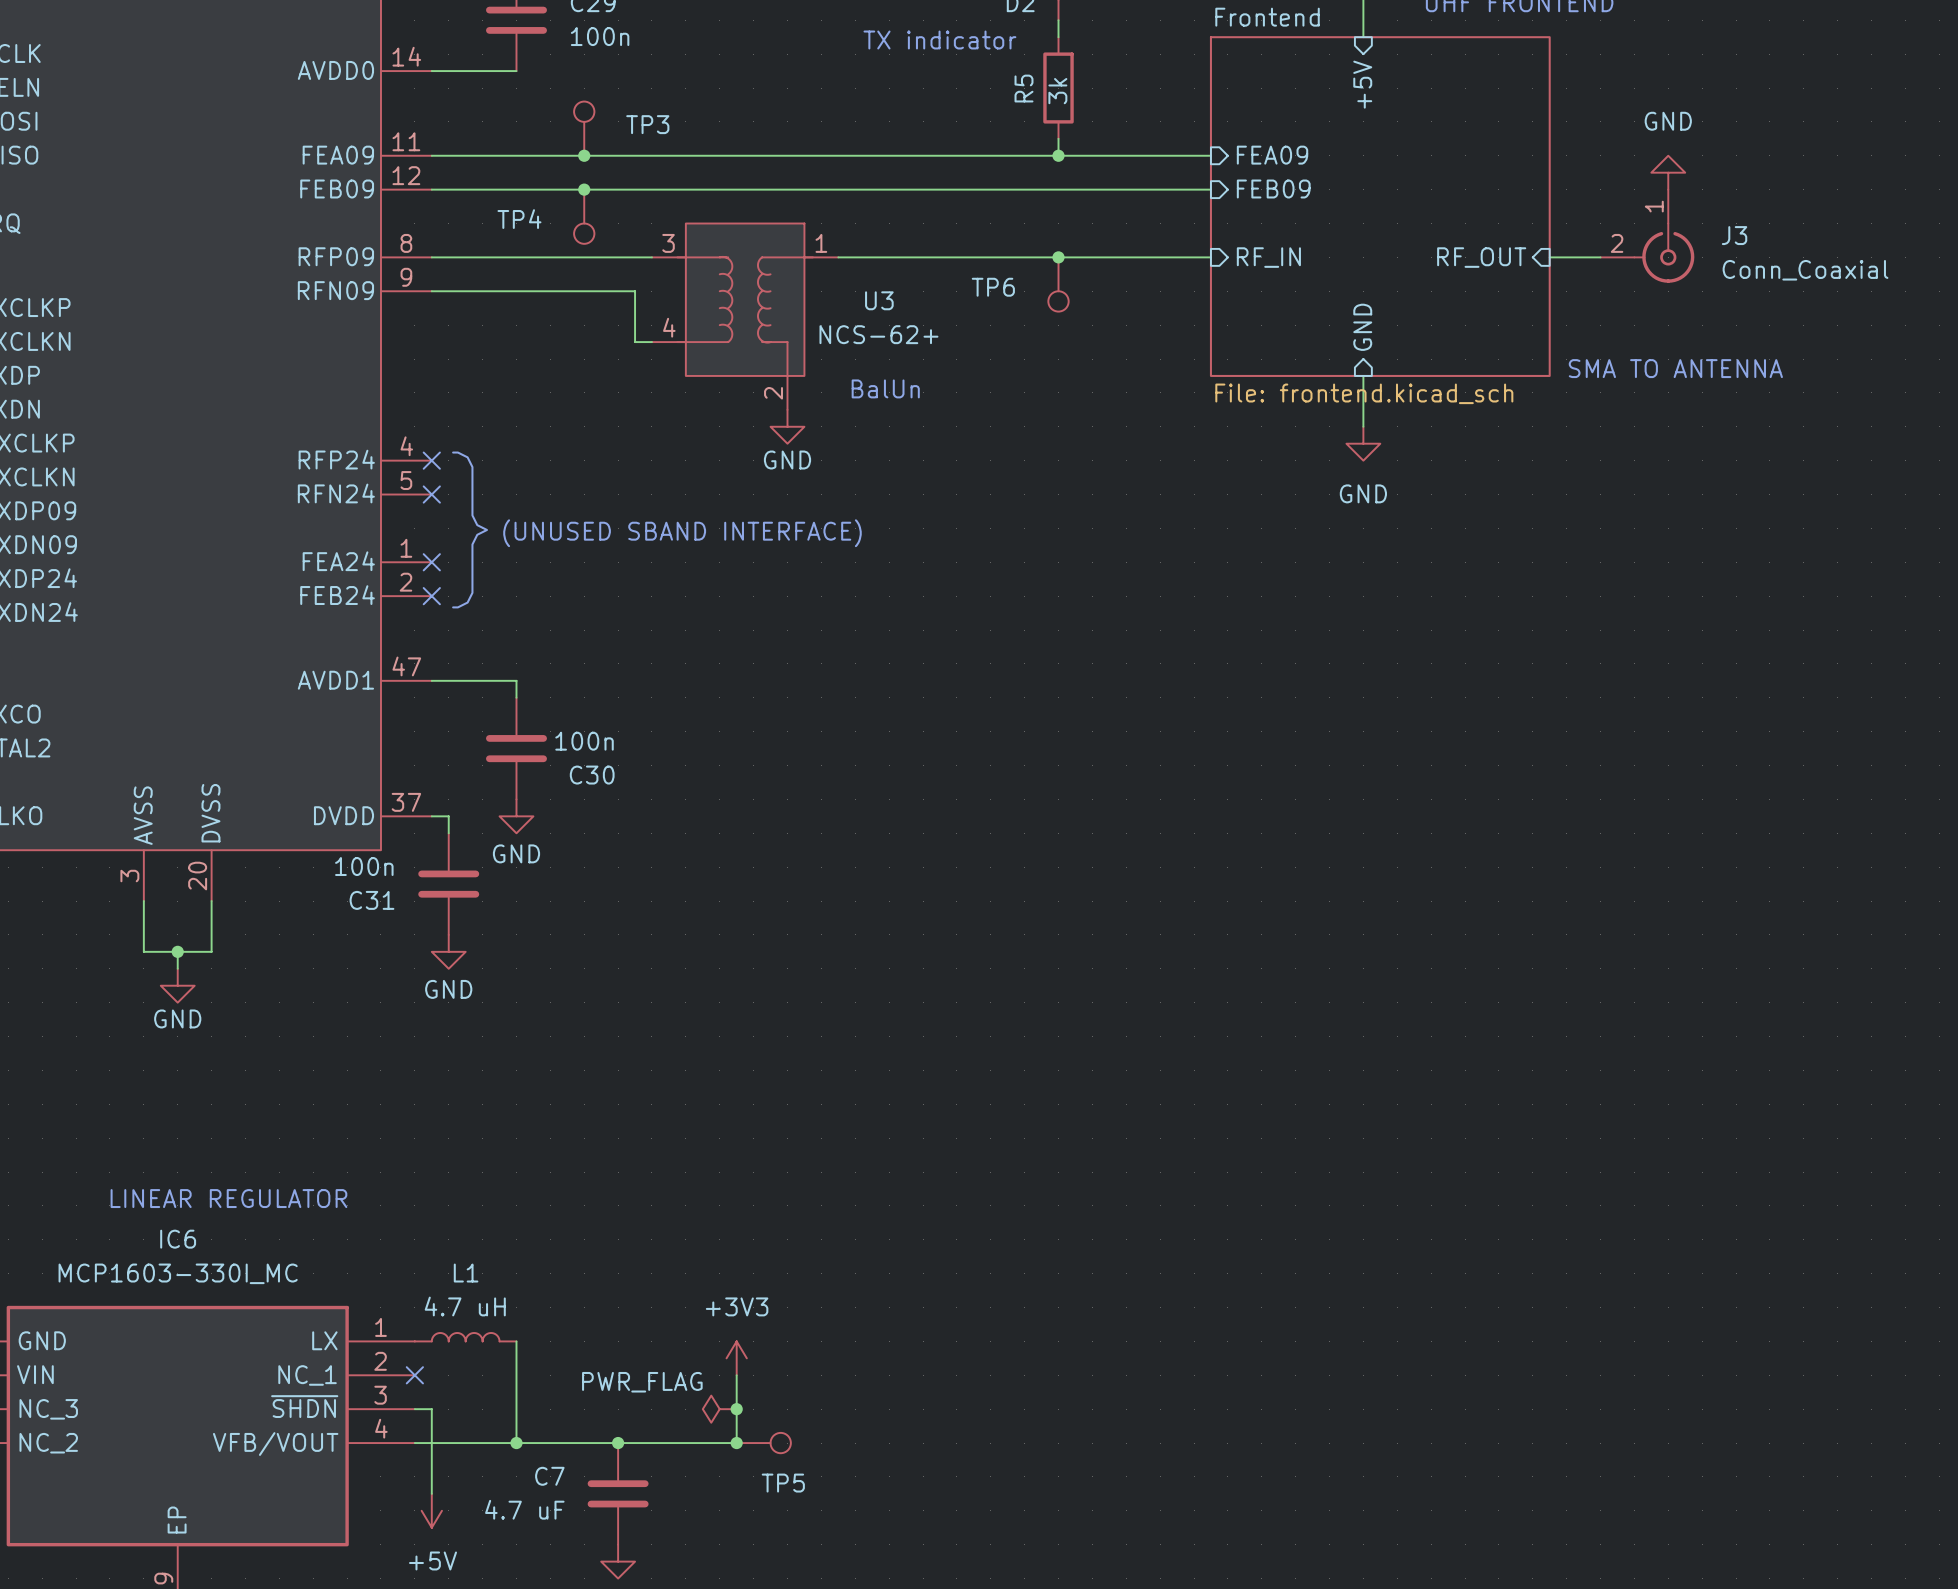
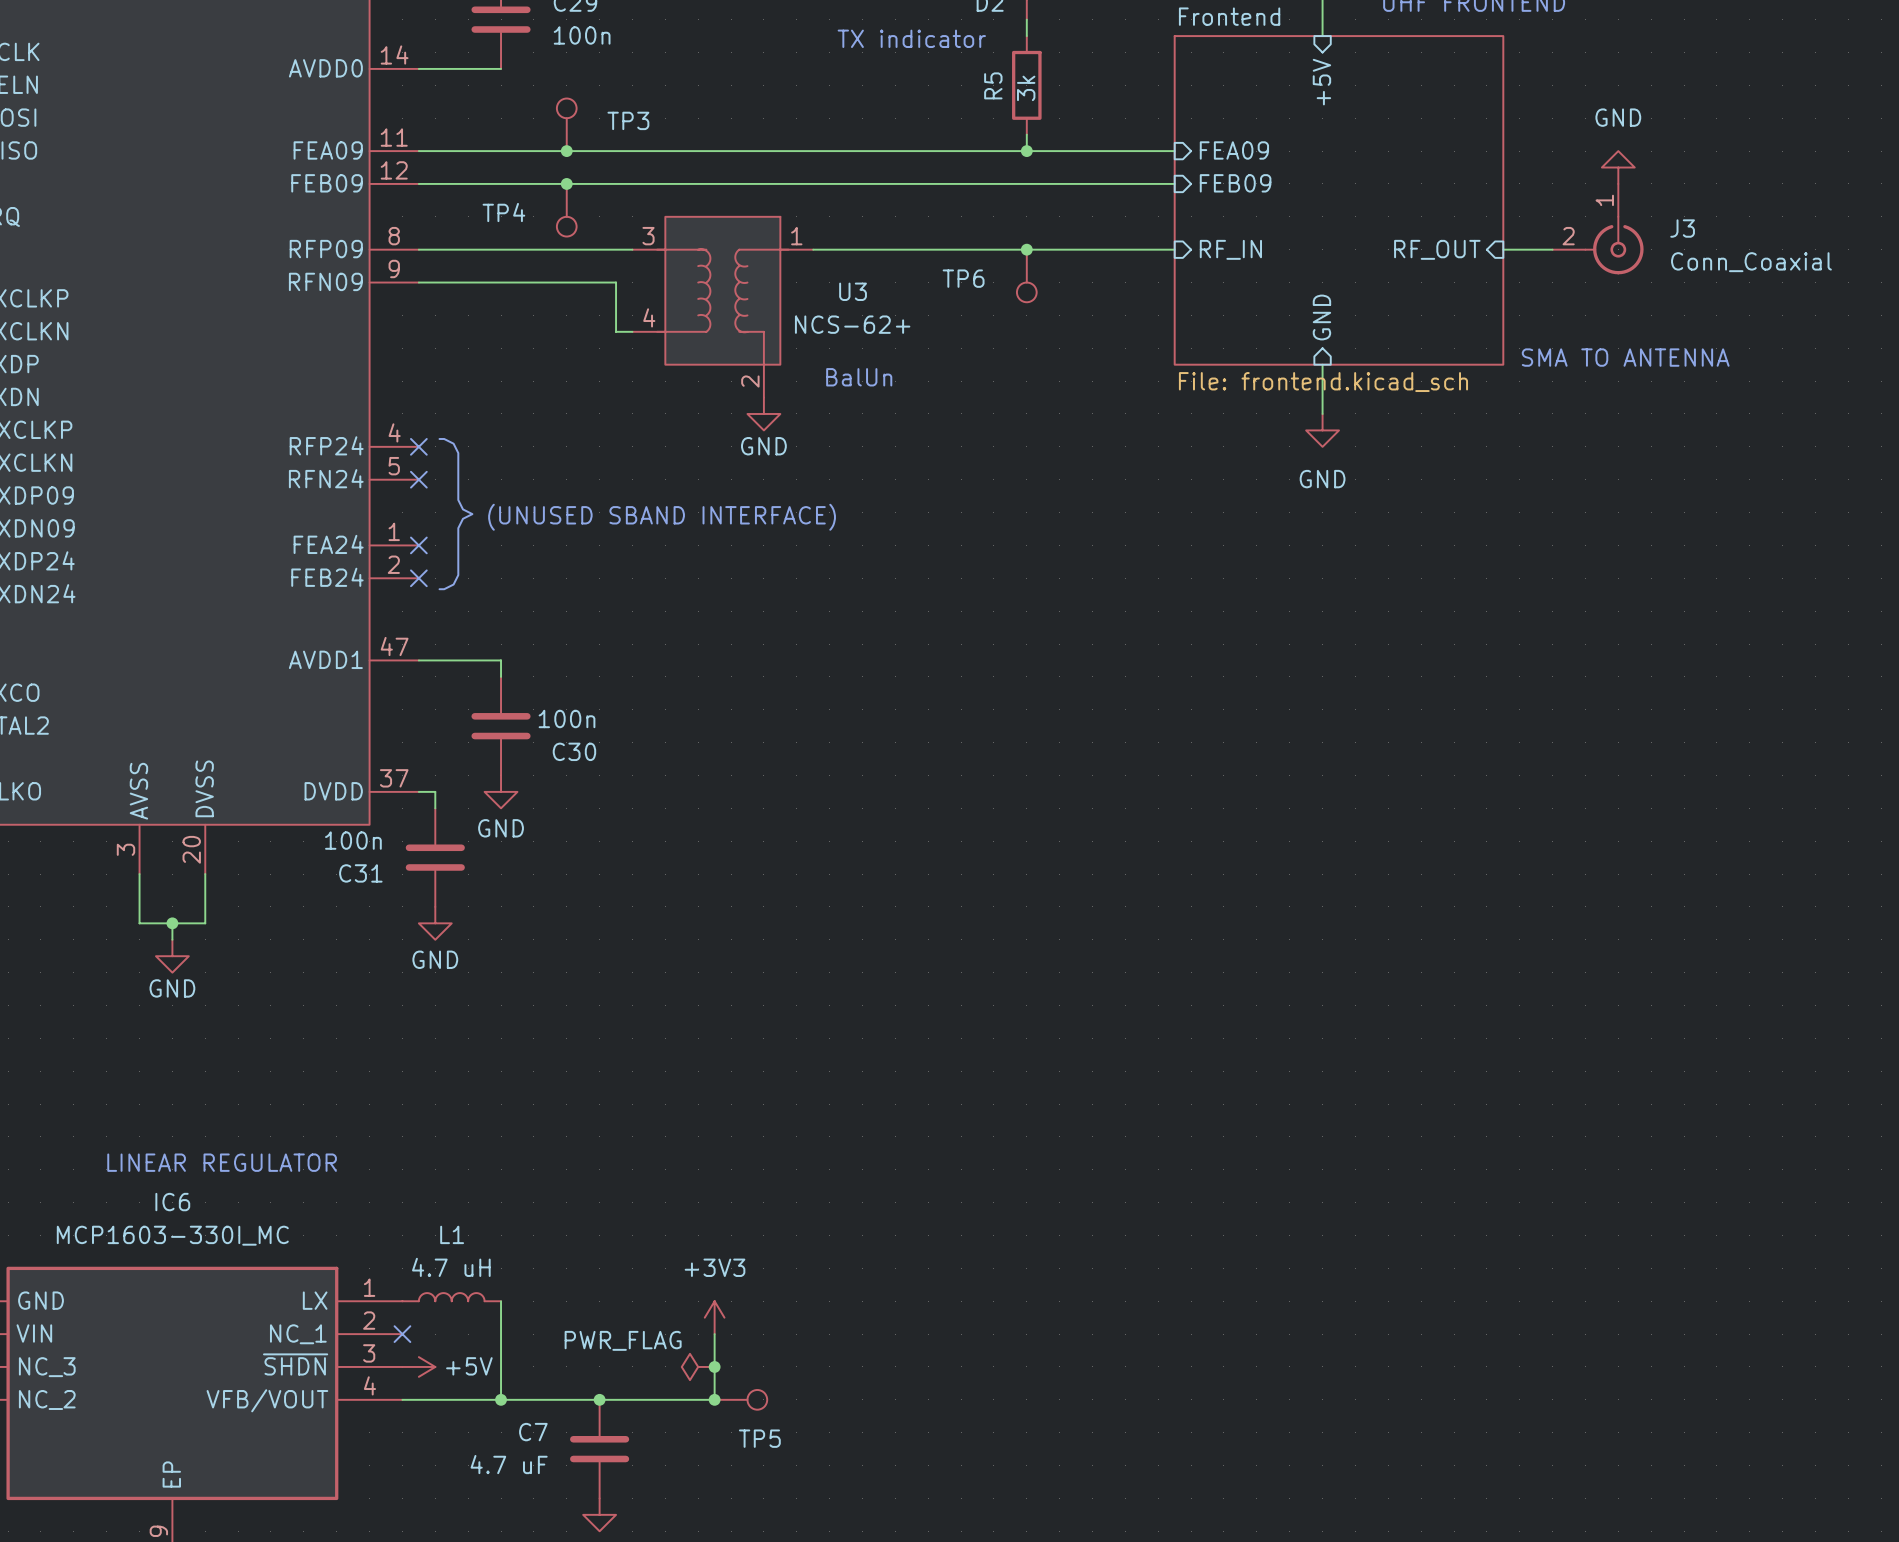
wire: (414, 1409) (431, 1409) (431, 1493) -> none
power symbol rotation: 0° (431, 1510) -> 90° counterclockwise (418, 1366)
power symbol position: +5V (431, 1510) -> +5V (418, 1366)

